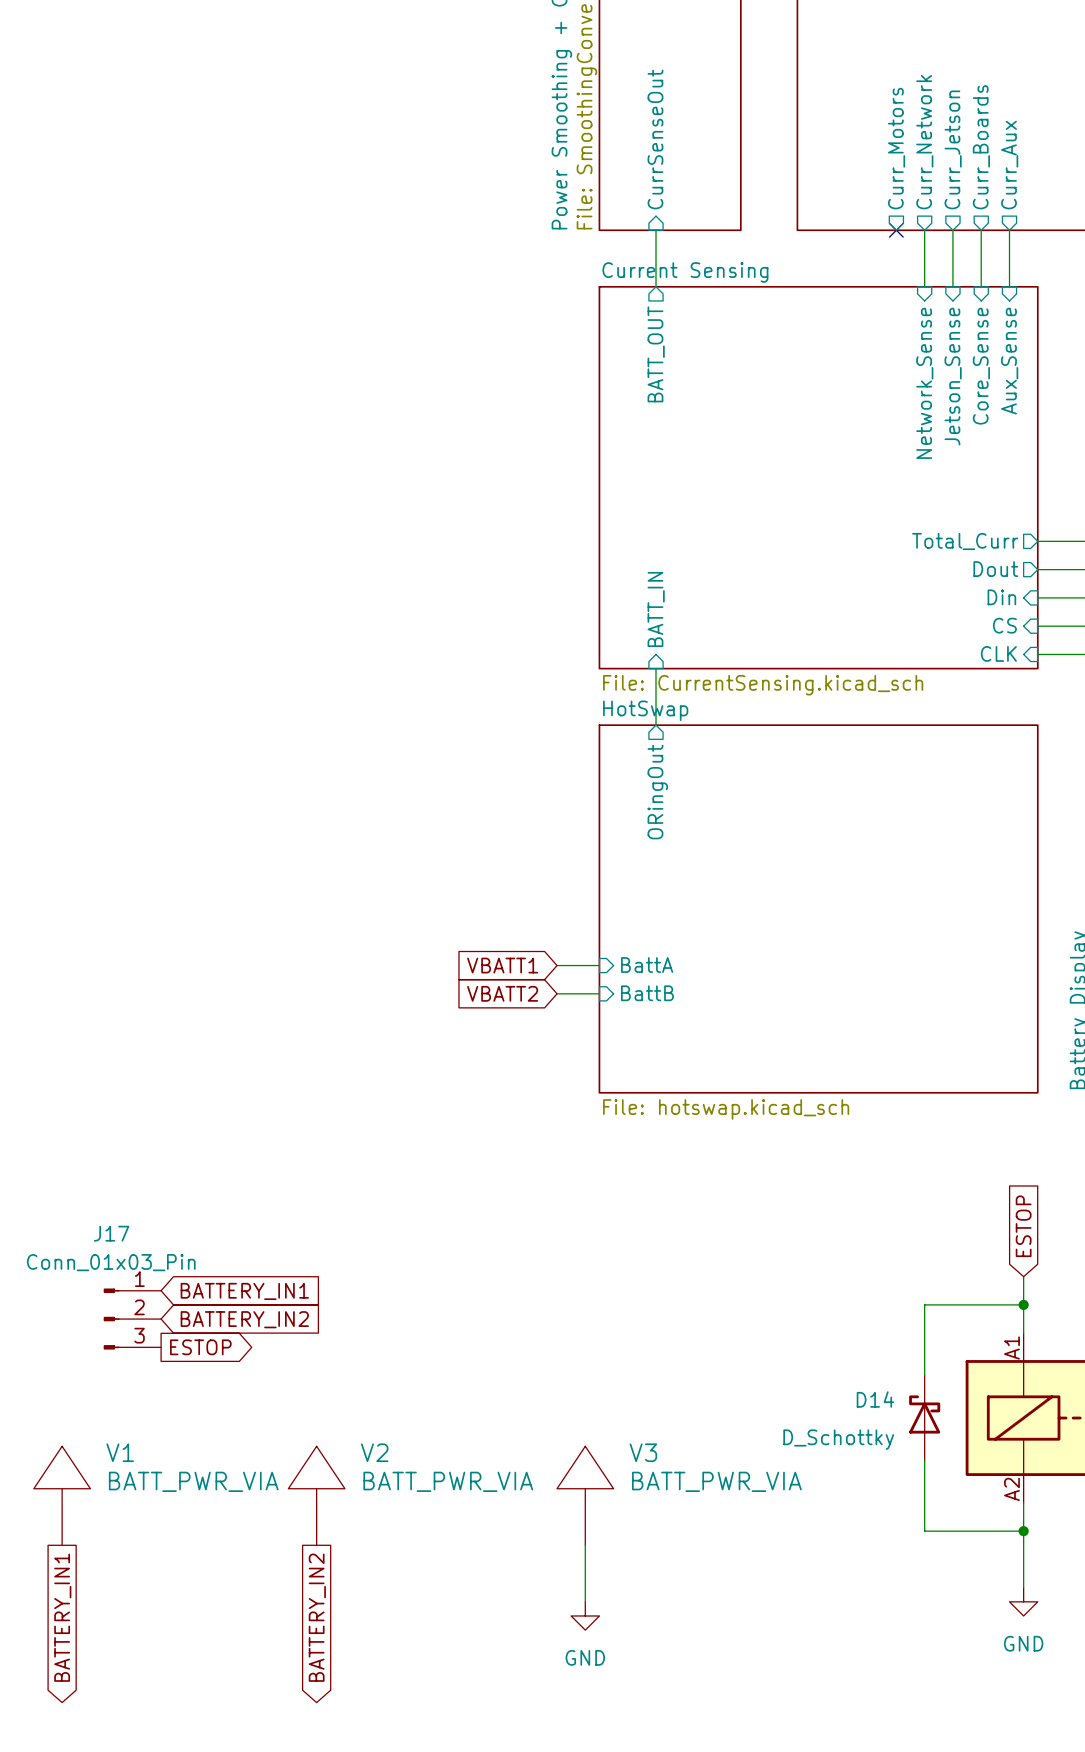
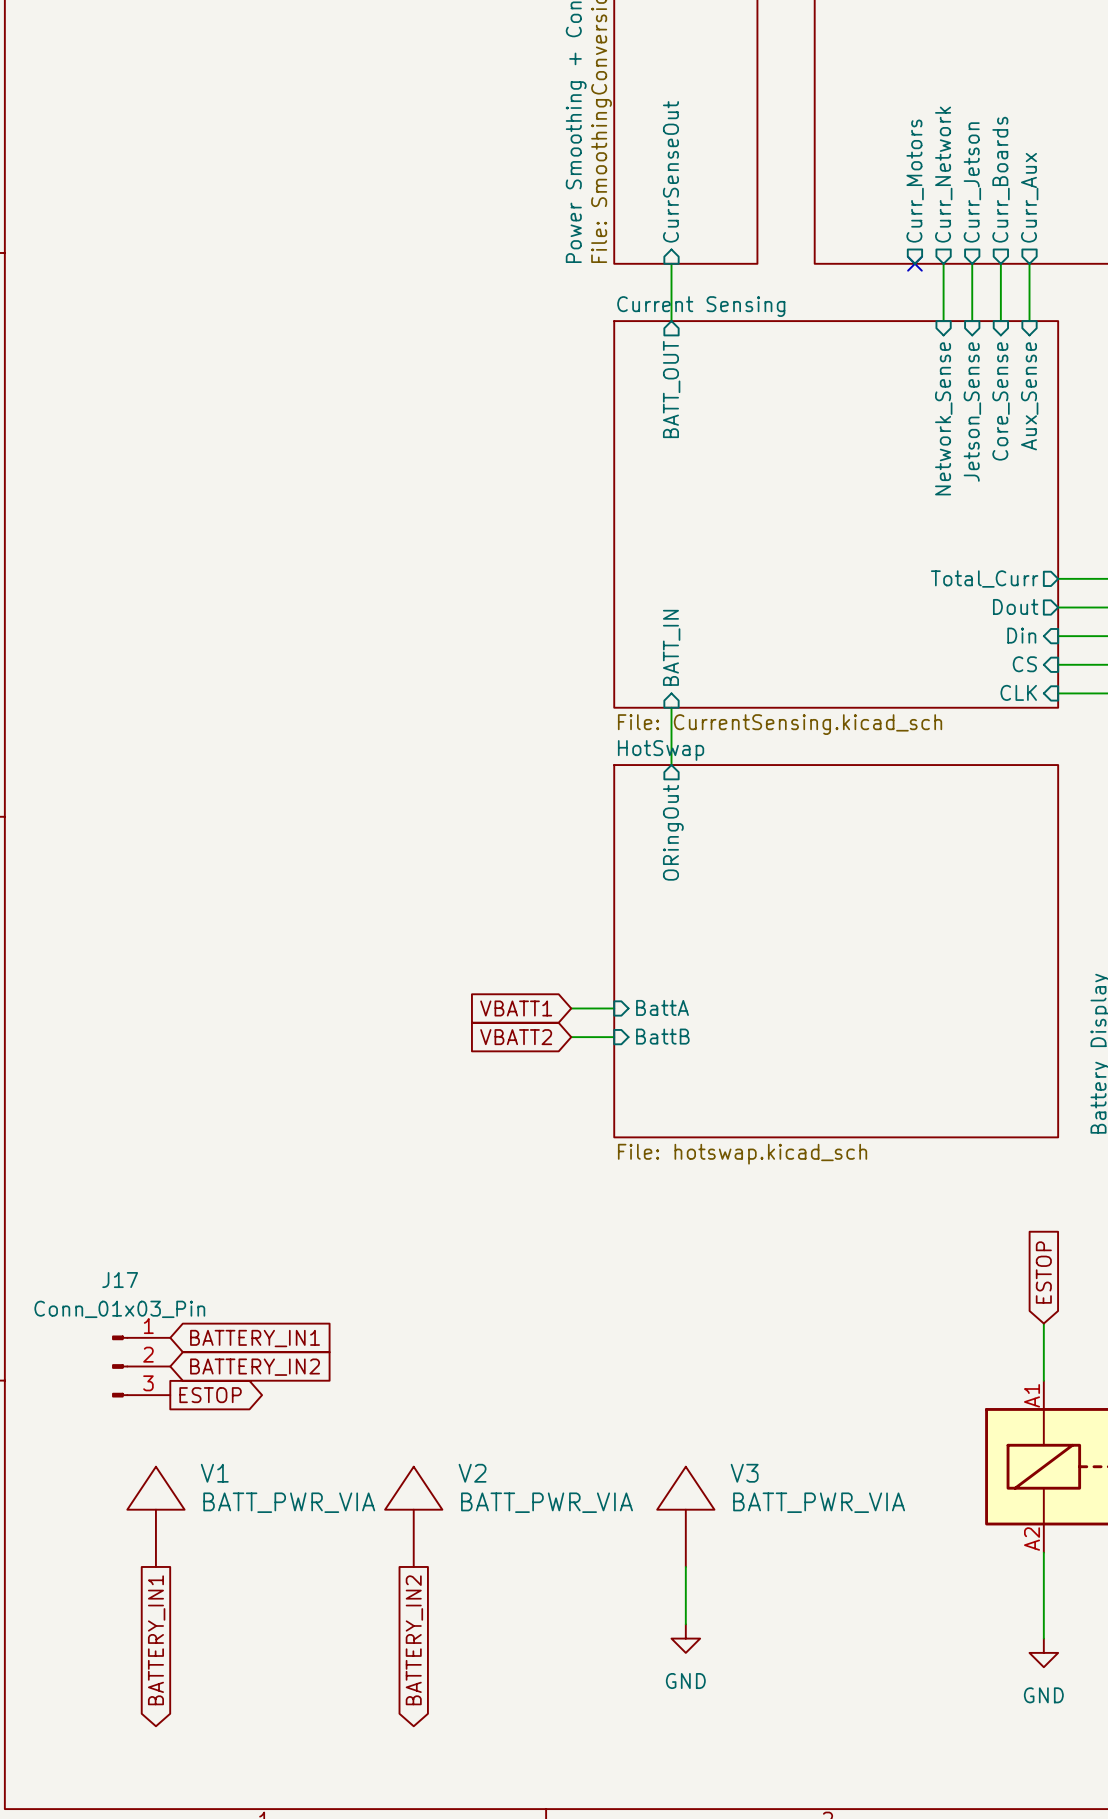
wire: (1023, 1304) (924, 1304) (924, 1375) -> none
junction: (1023, 1304) -> none
D14: D_Schottky (924, 1418) -> none
wire: (924, 1460) (924, 1531) (1023, 1531) -> none
V1 position: (62, 1495) -> (155, 1516)
V2 position: (316, 1495) -> (413, 1516)
V3 position: (585, 1495) -> (685, 1516)
junction: (1023, 1531) -> none
wire: (585, 1545) (585, 1601) -> (685, 1566) (685, 1624)
power symbol position: GND (585, 1615) -> GND (685, 1638)
global label position: BATTERY_IN1 (62, 1617) -> BATTERY_IN1 (156, 1640)
global label position: BATTERY_IN2 (317, 1617) -> BATTERY_IN2 (414, 1640)

